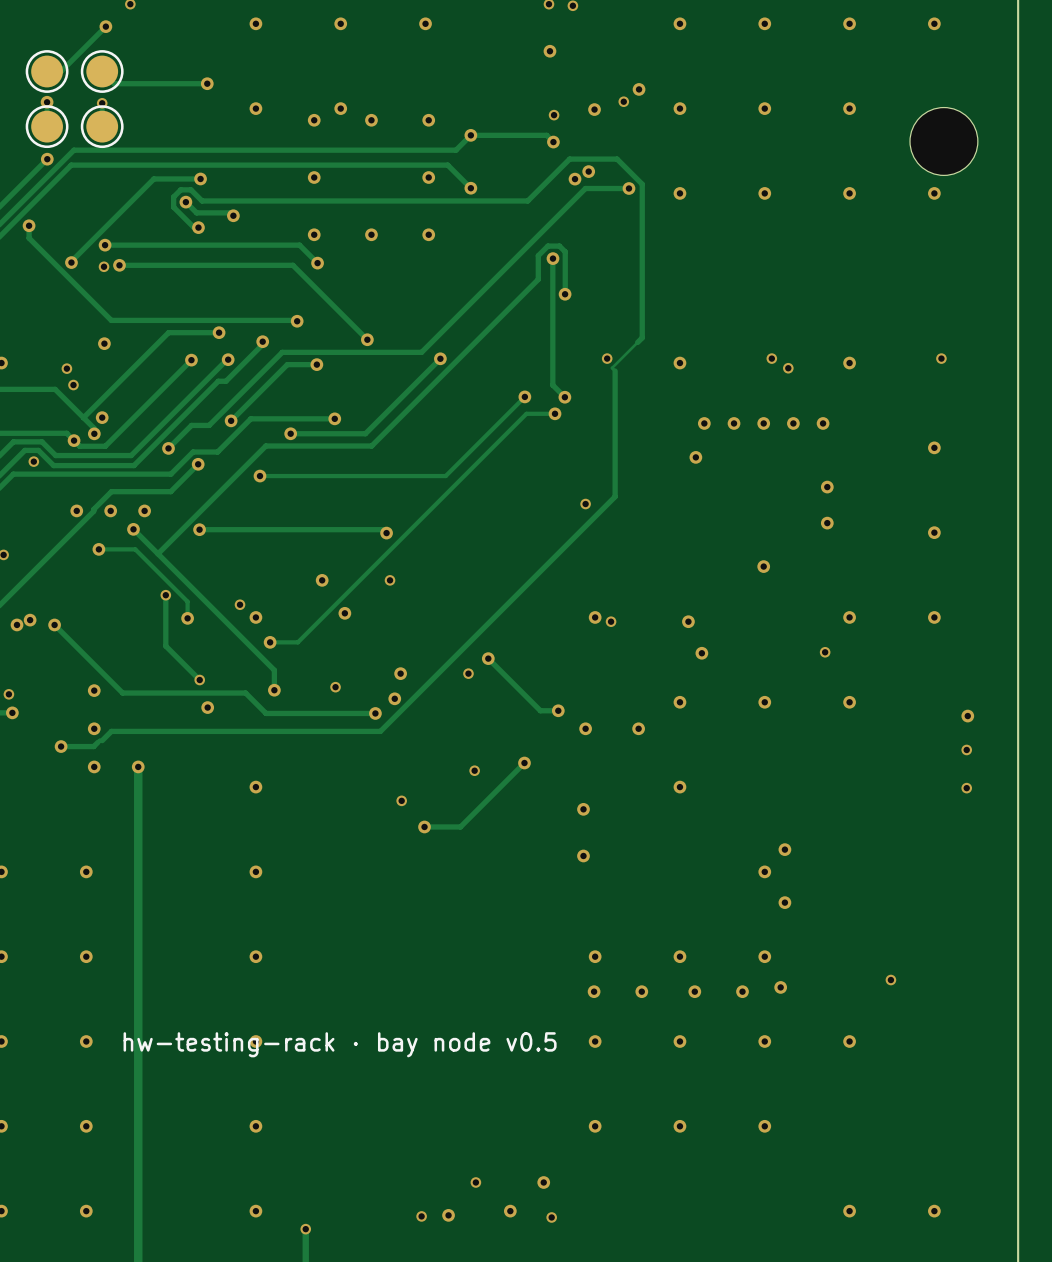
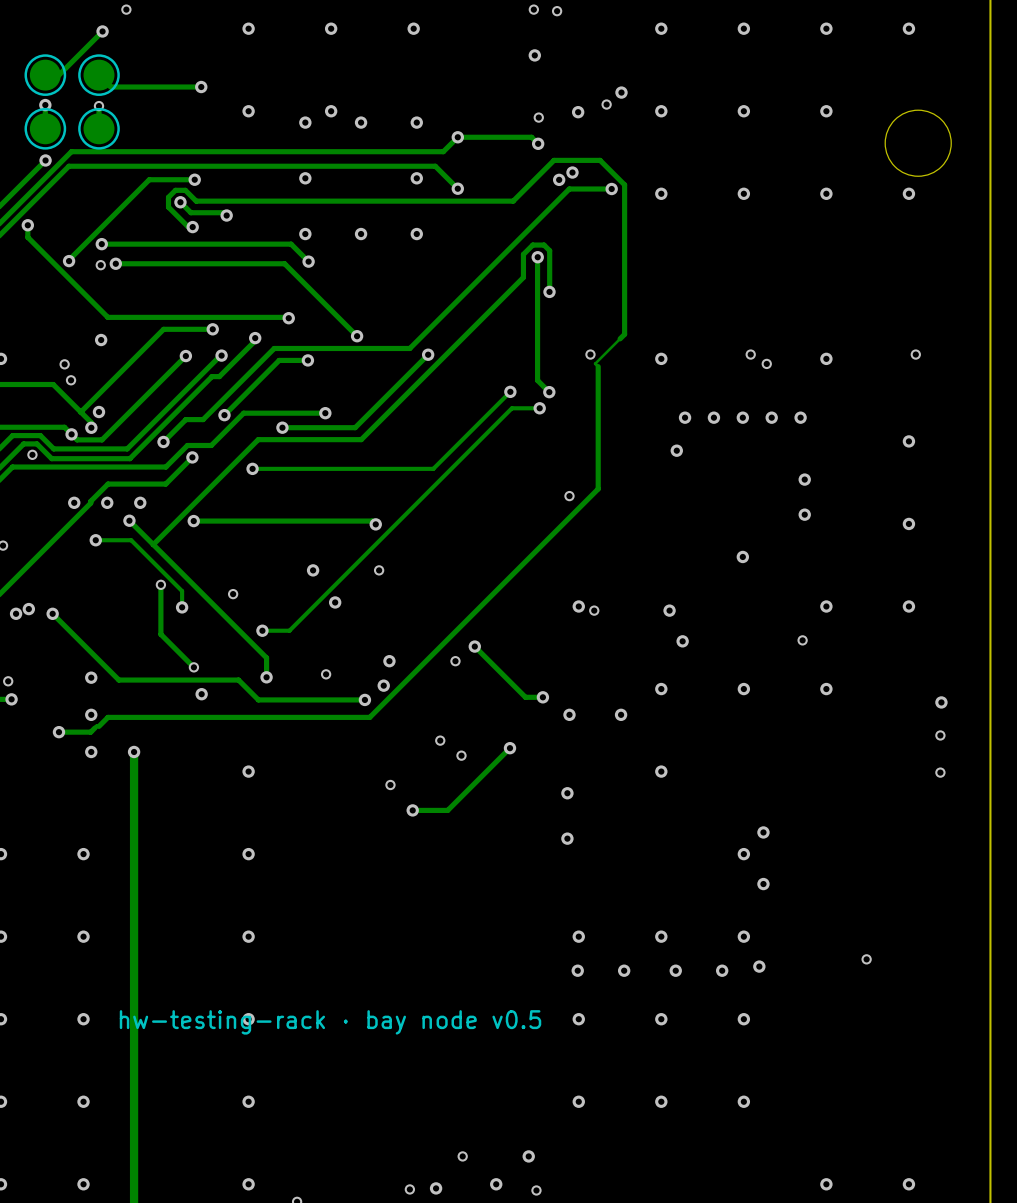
via: (255, 617) -> none
via: none -> (440, 740)
via: (849, 1041) -> none

